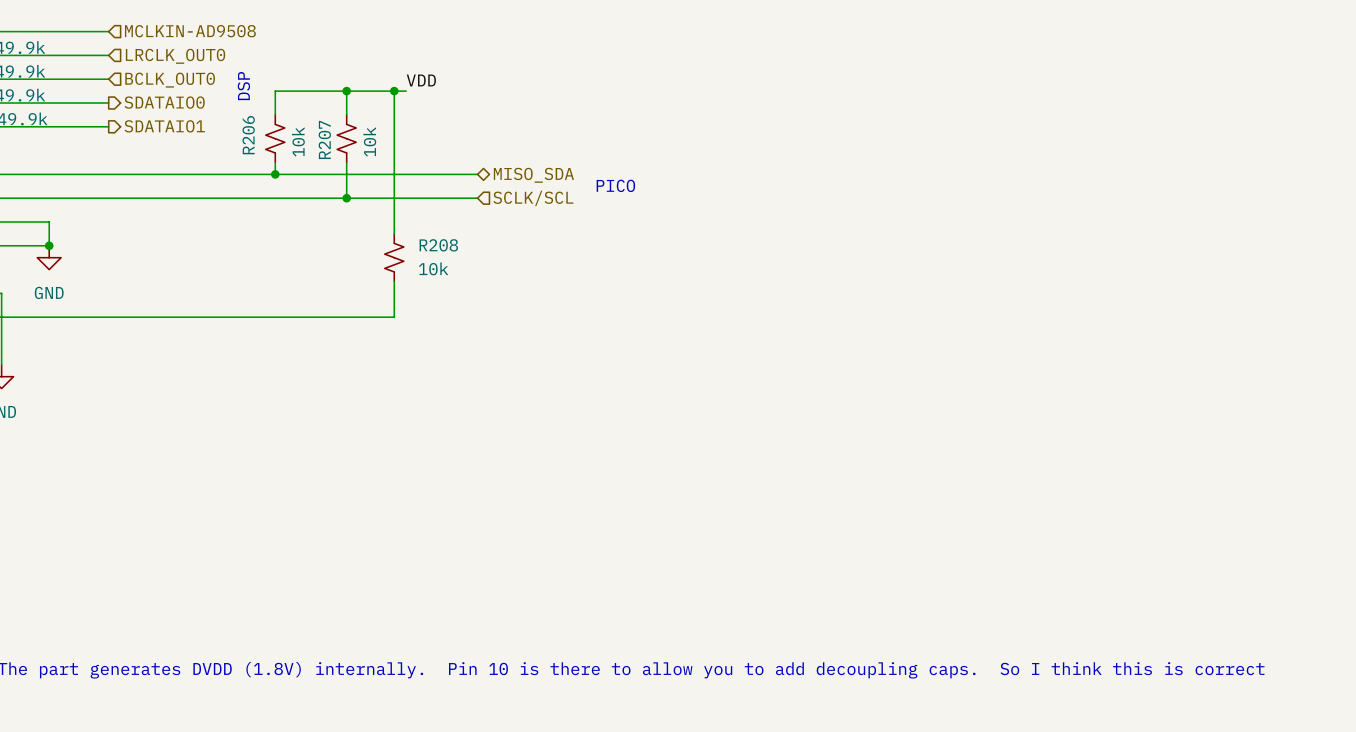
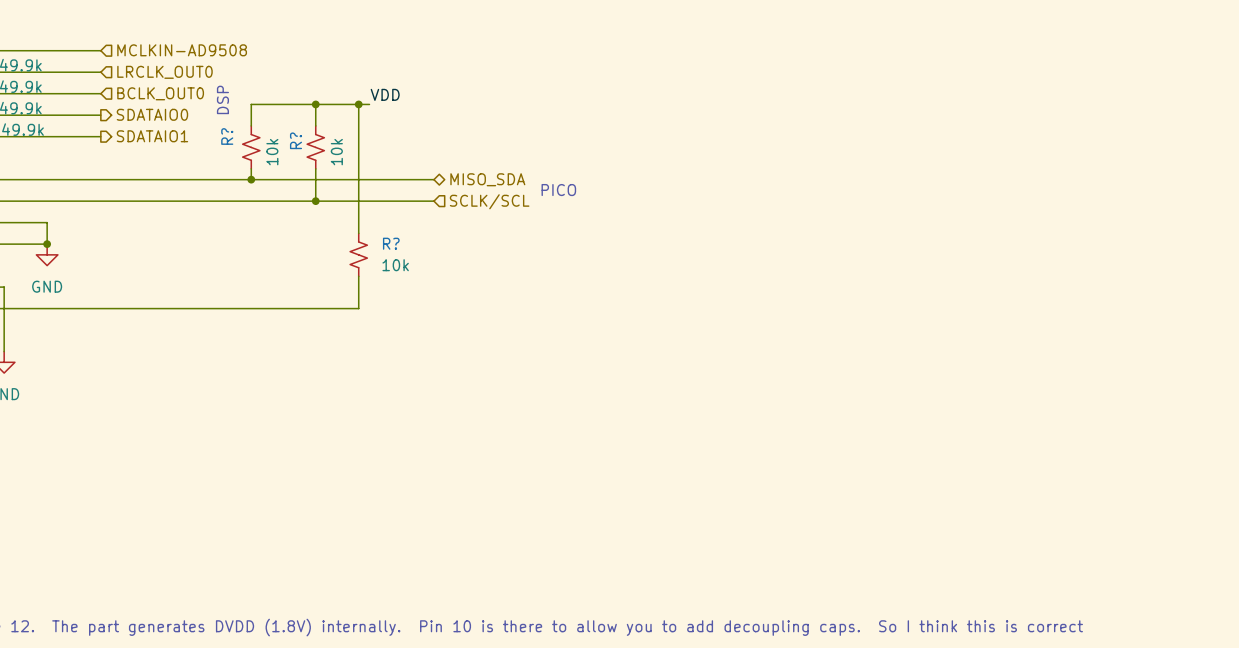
R206 name: R206 (248, 135) -> R? (227, 136)
R207 name: R207 (324, 139) -> R? (296, 140)
R208 name: R208 (438, 245) -> R? (391, 243)

